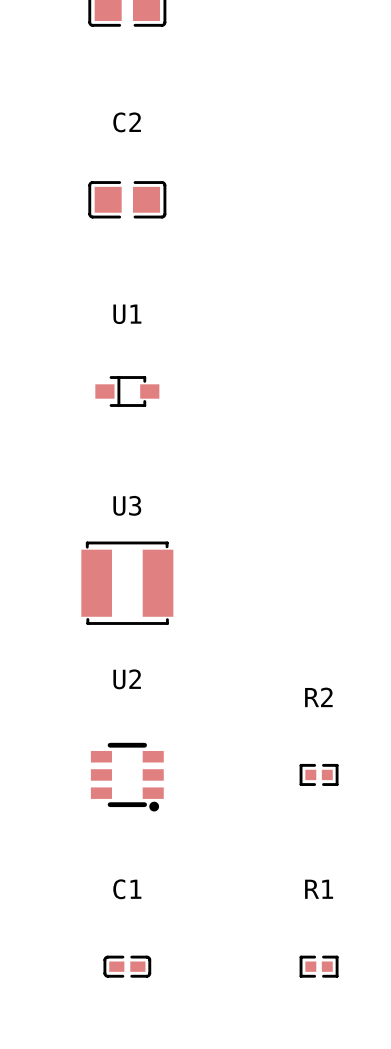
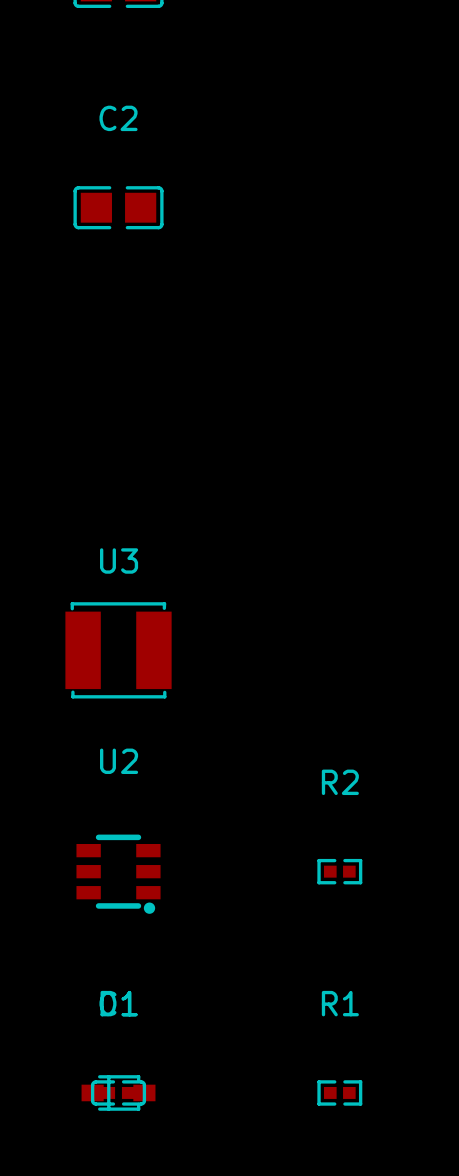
U1: (127, 391) -> none
part: none -> (118, 1092)

